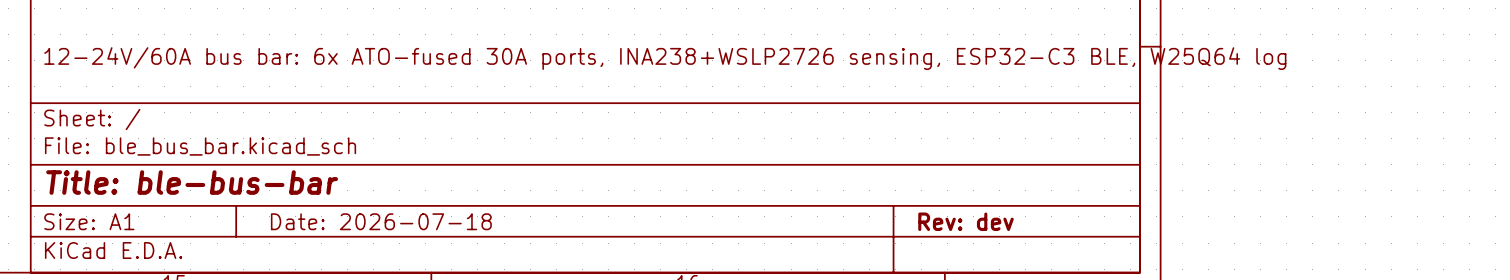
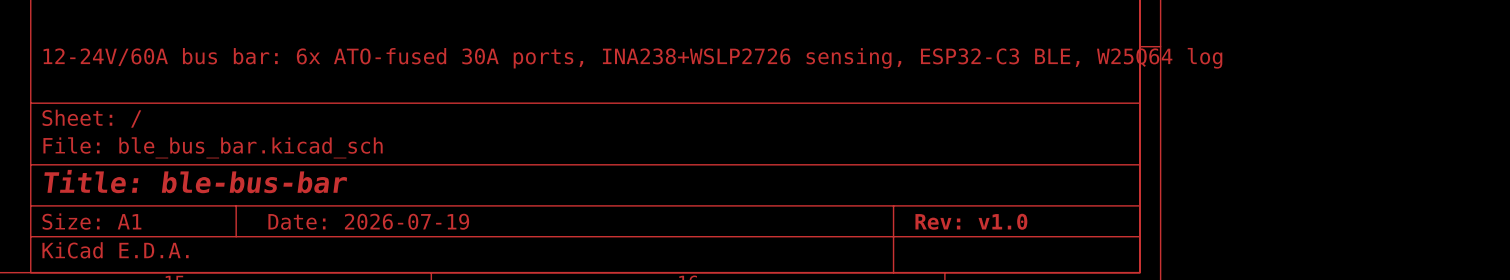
title block: Date: 2026-07-18 (381, 221) -> Date: 2026-07-19 (368, 221)
title block: Rev: dev (966, 221) -> Rev: v1.0 (971, 221)

